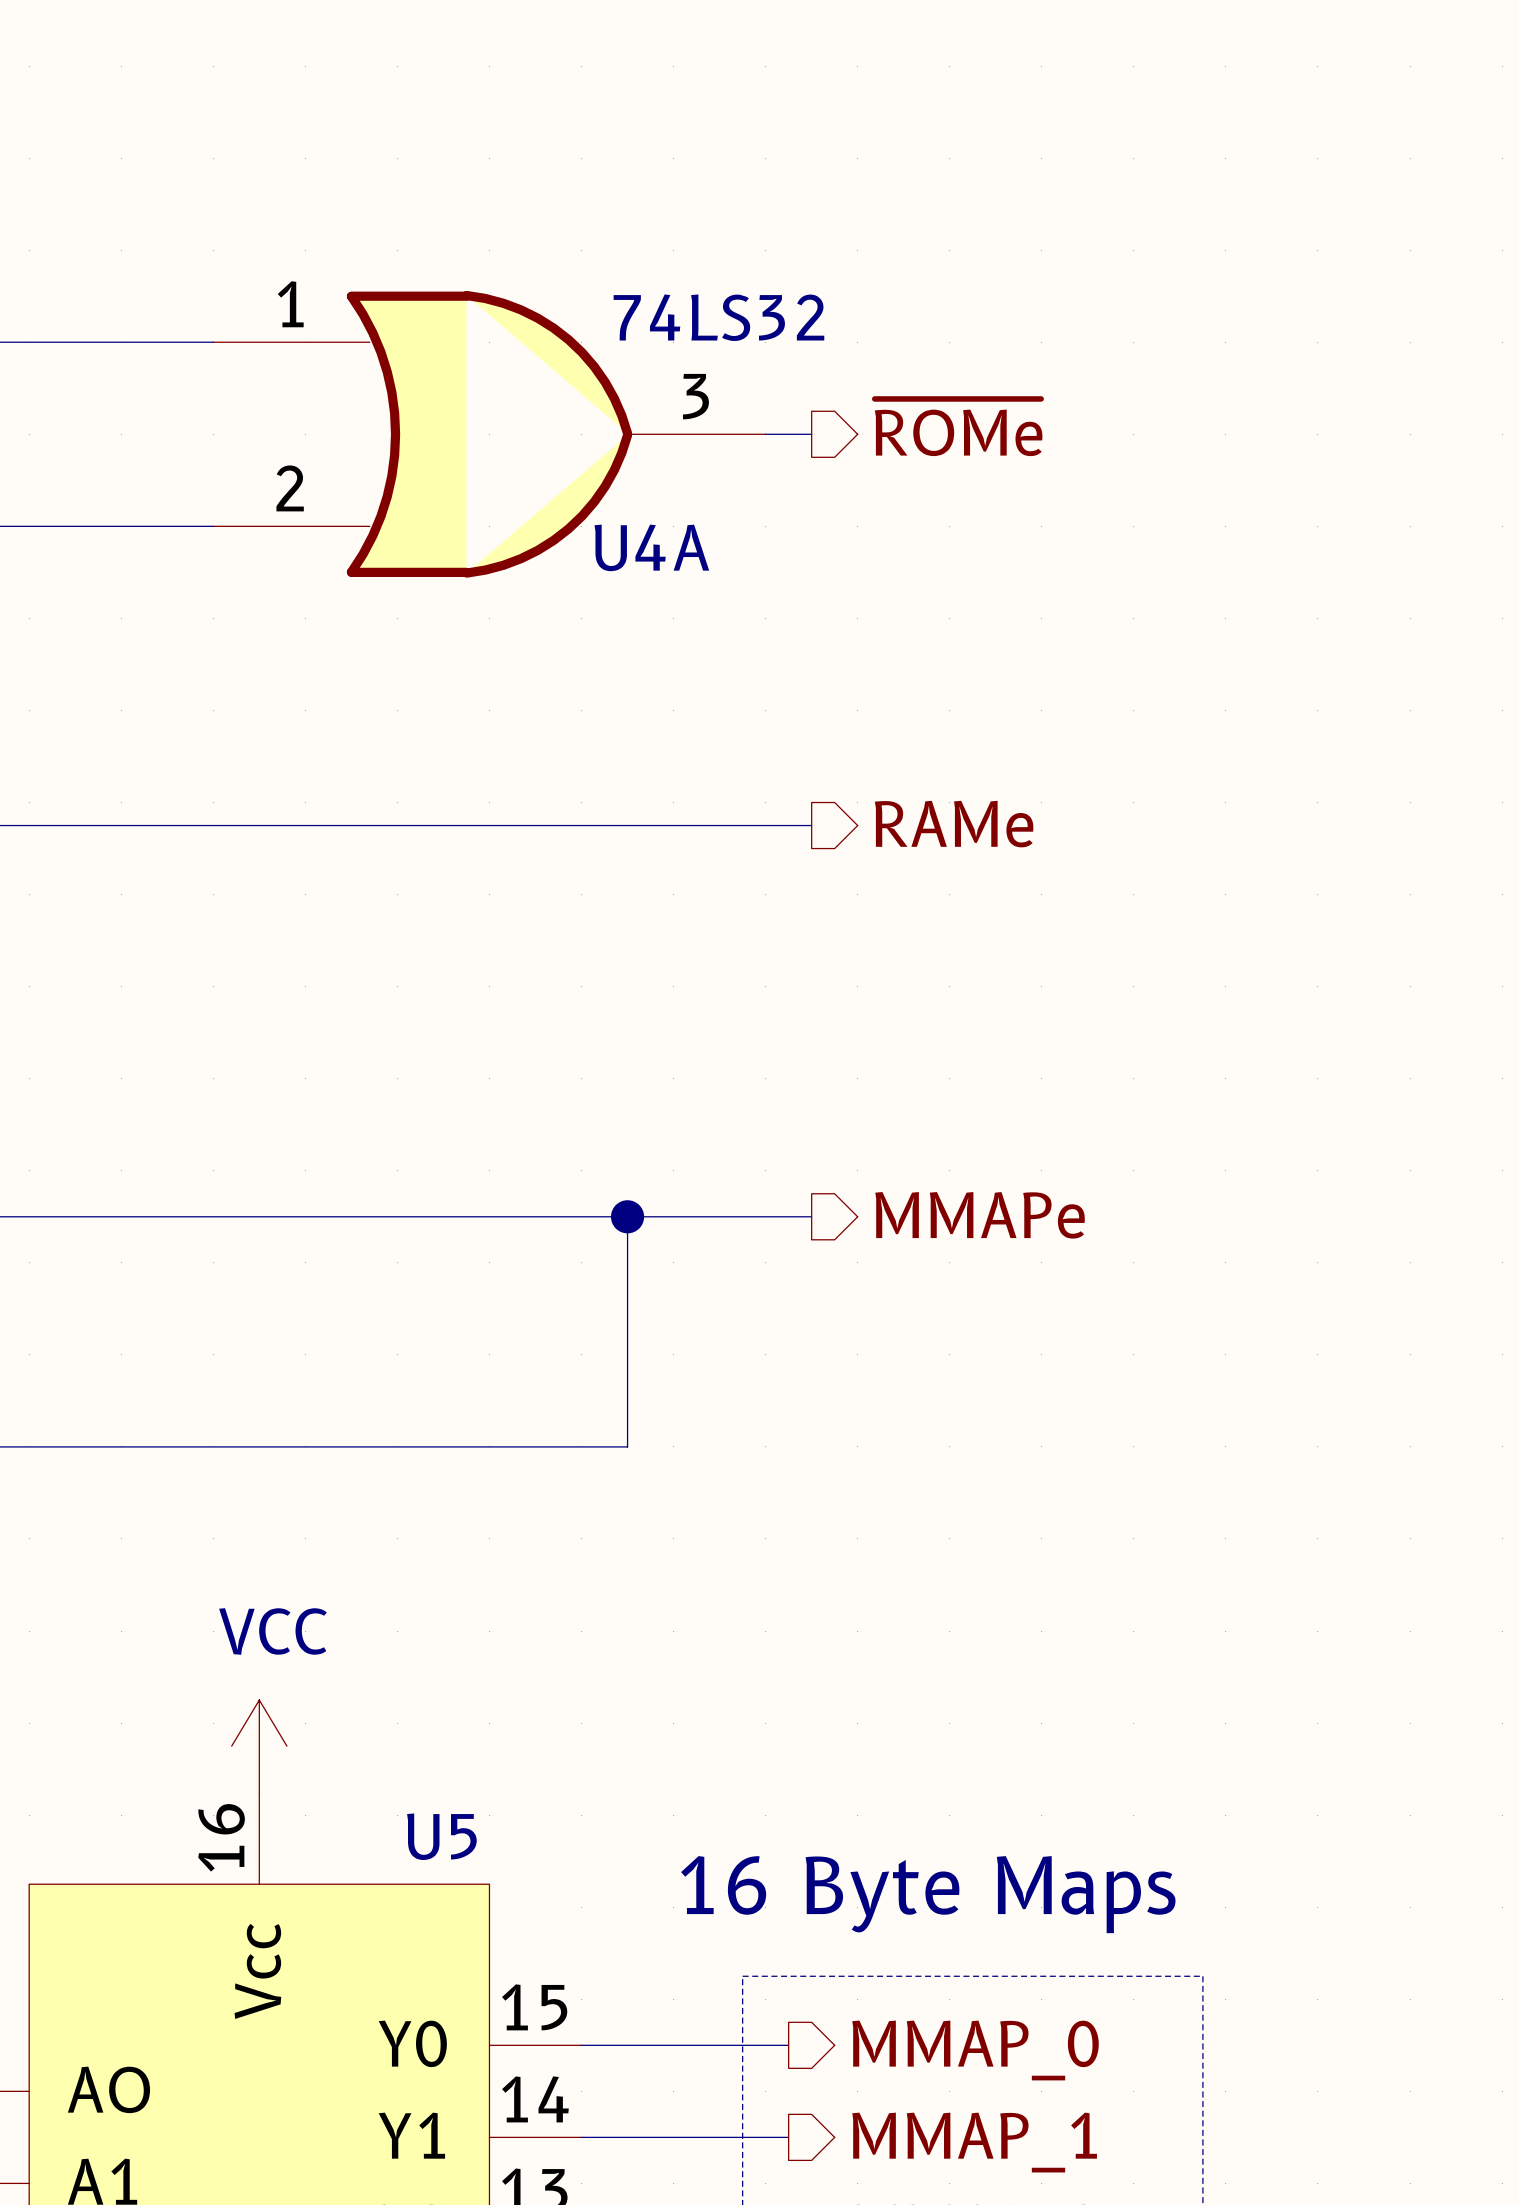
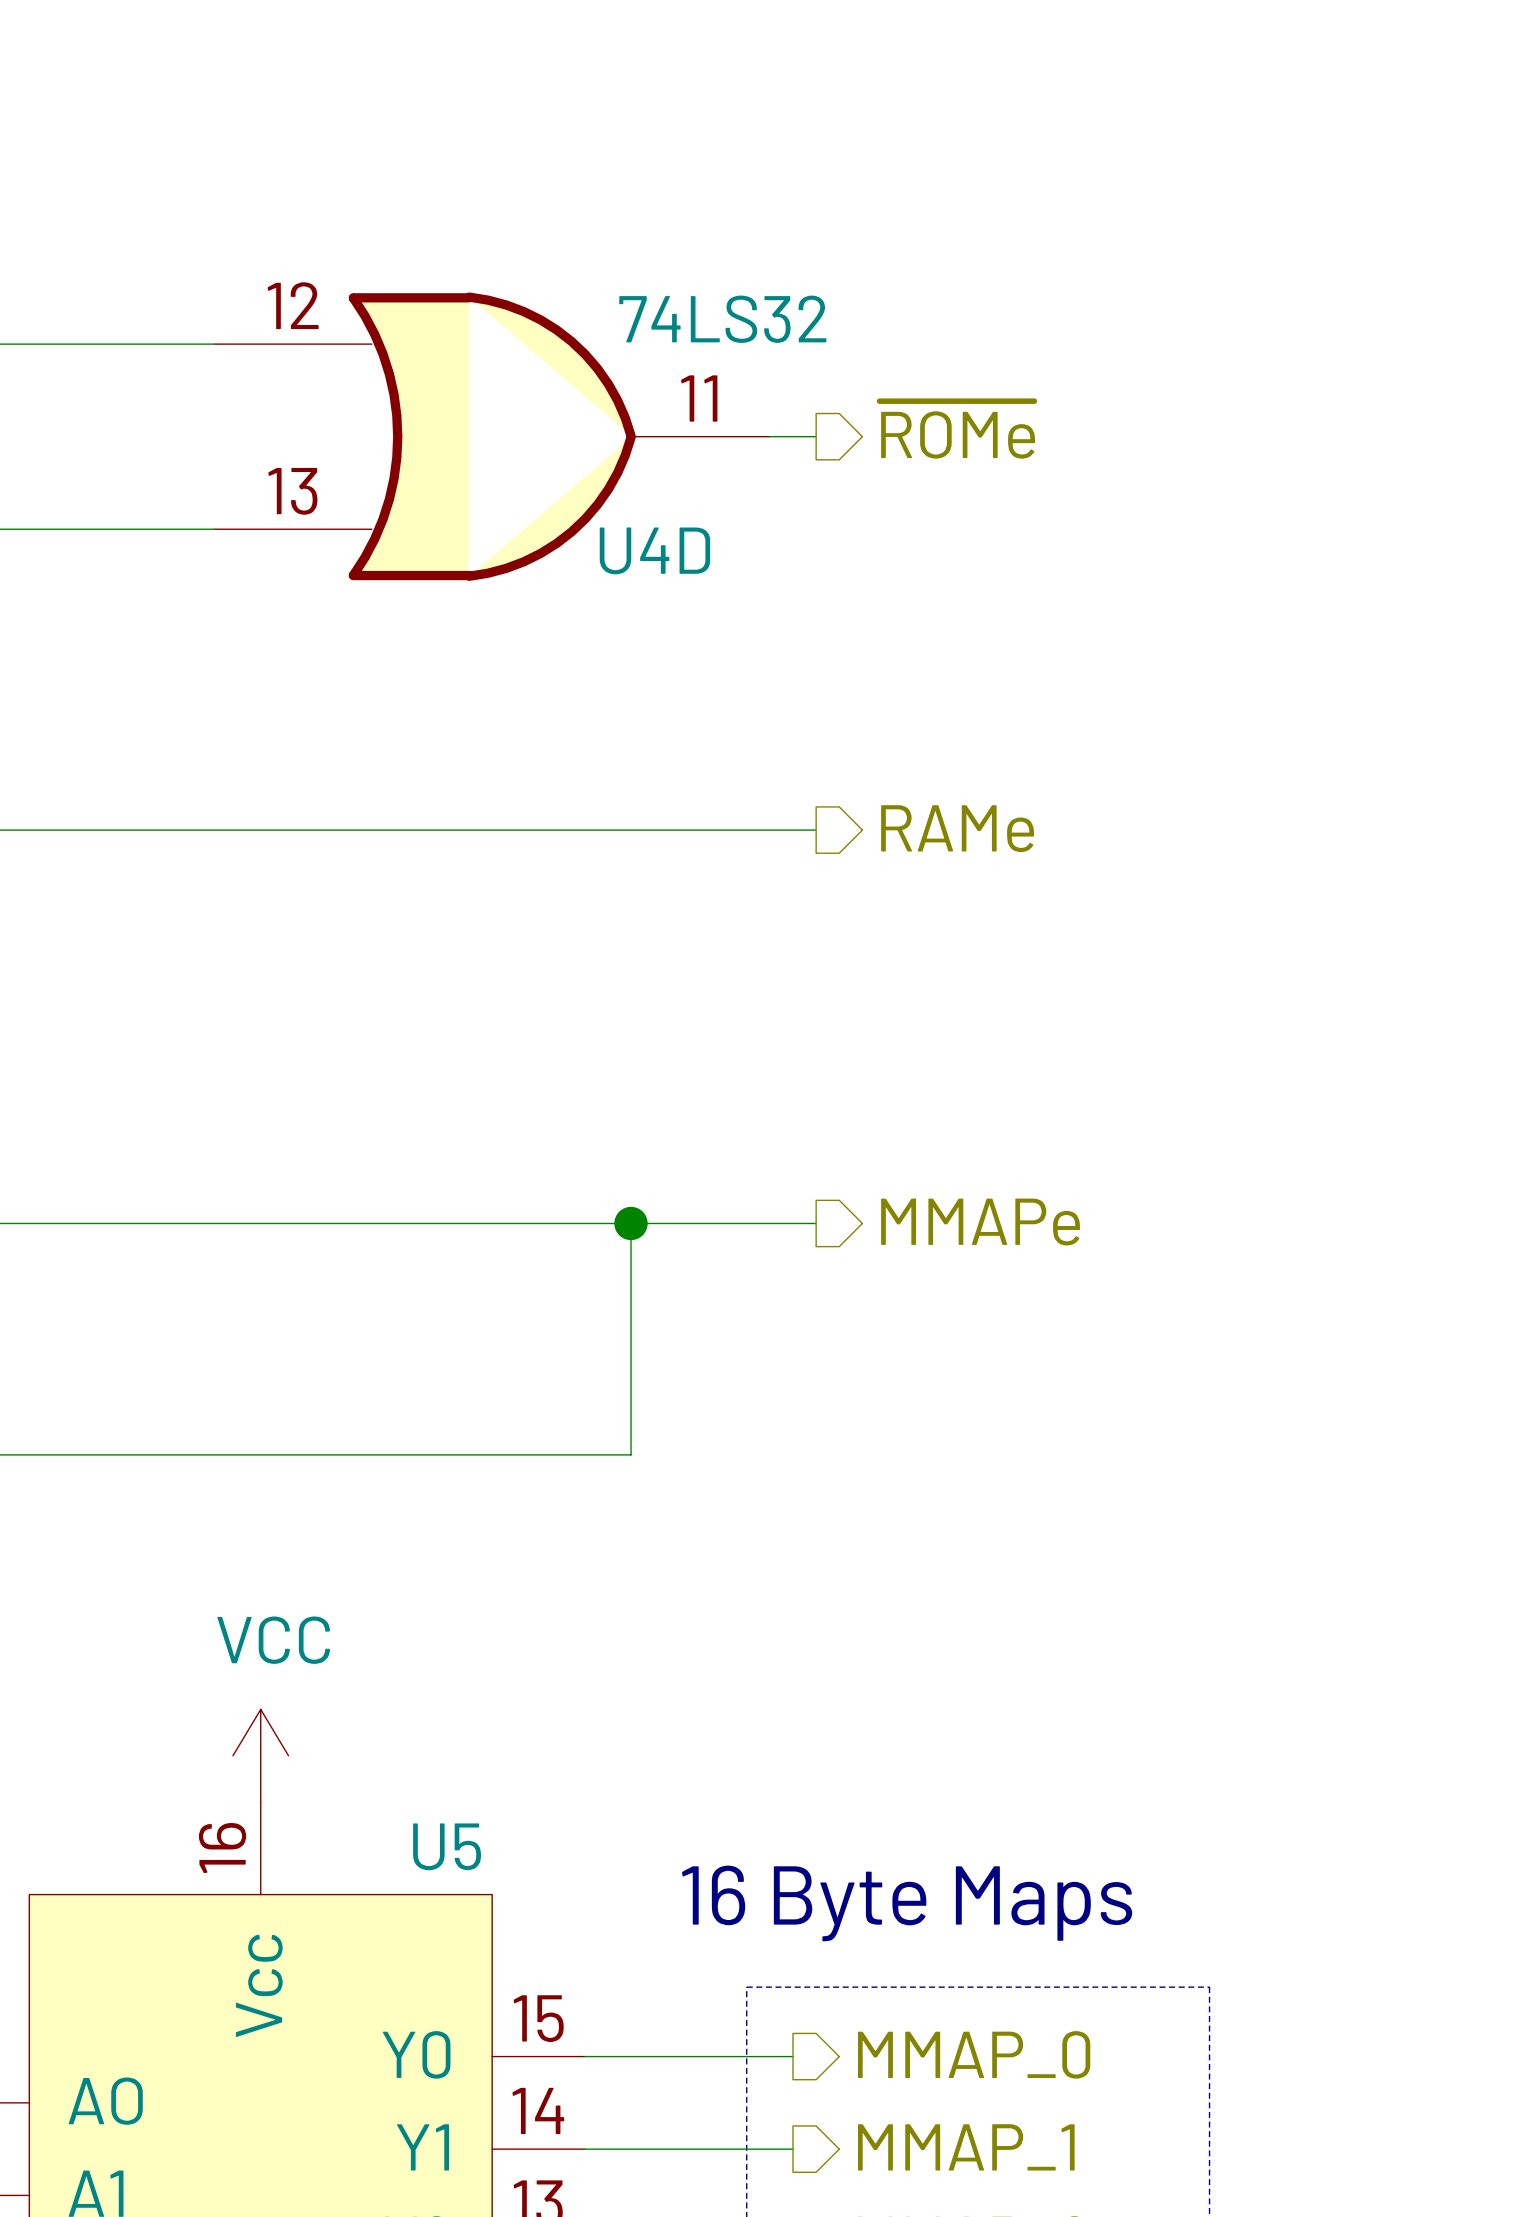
U4A pin number: 1 (290, 304) -> 12 (293, 305)
U4A pin number: 3 (695, 396) -> 11 (699, 398)
U4A pin number: 2 (290, 488) -> 13 (292, 491)
U4A name: U4A (651, 547) -> U4D (654, 550)

